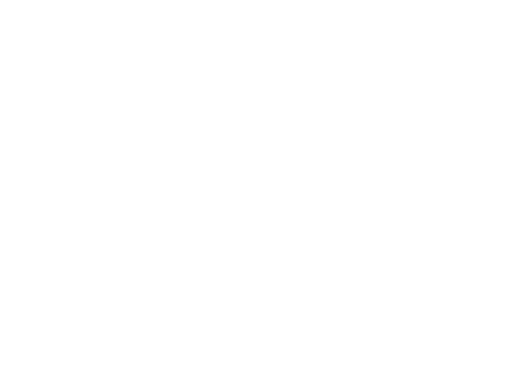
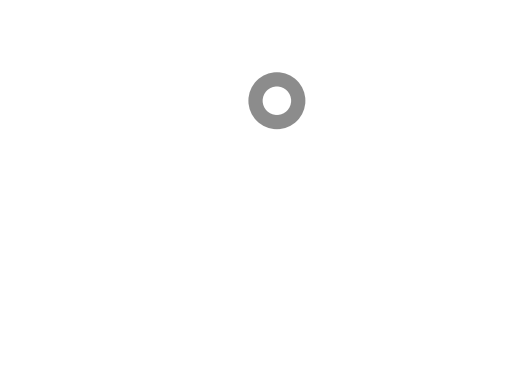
via: none -> (276, 100)

